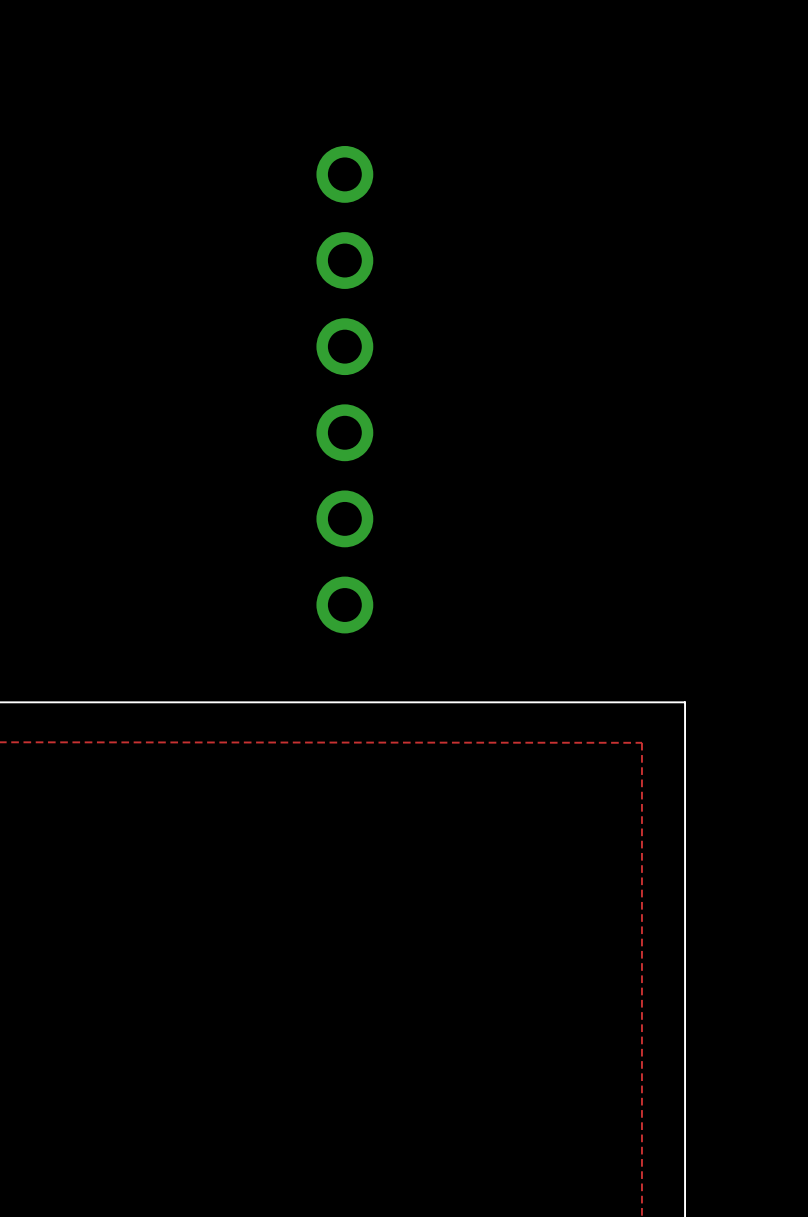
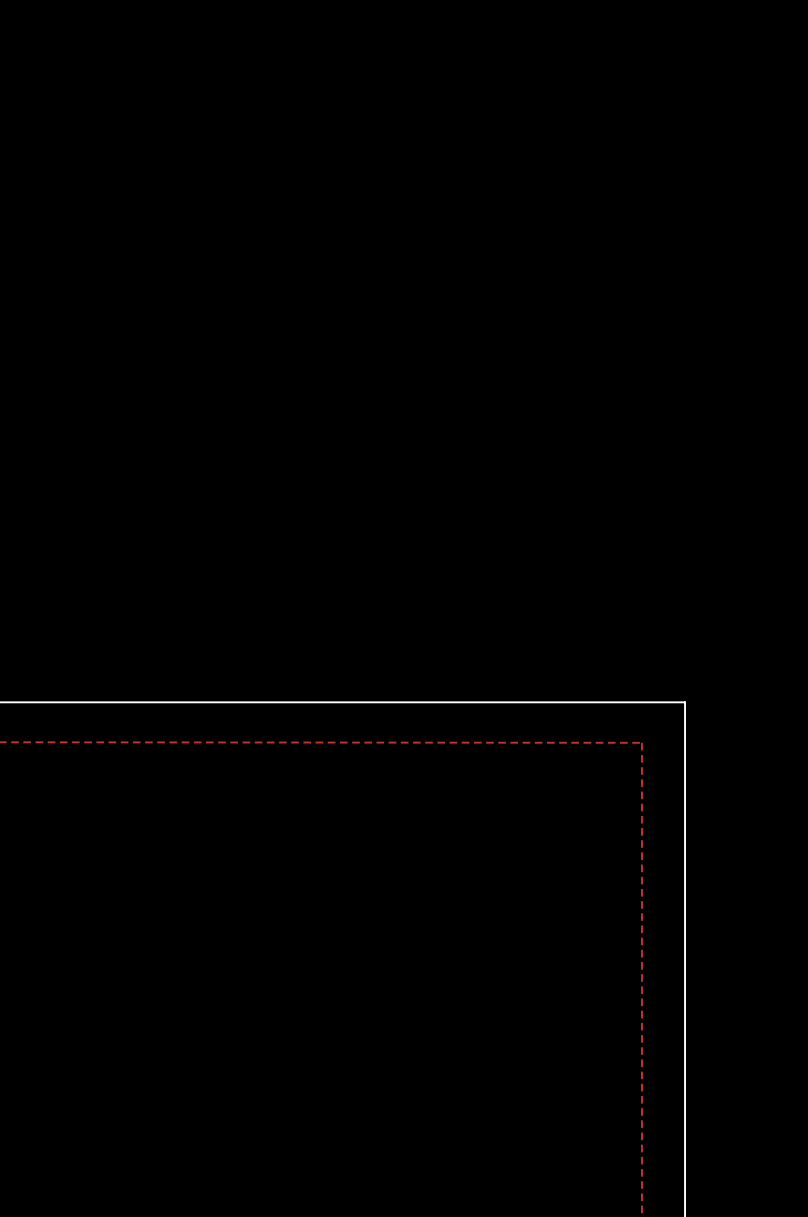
part: (344, 389) -> none

